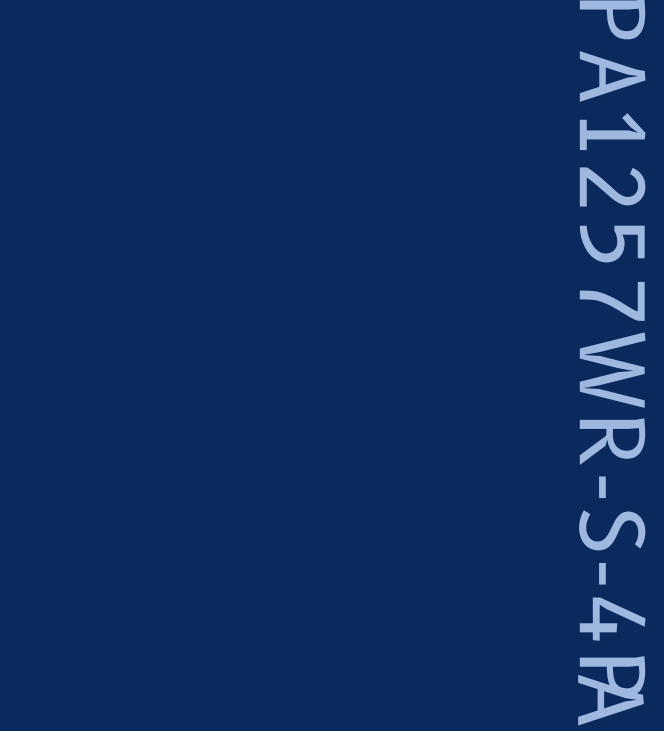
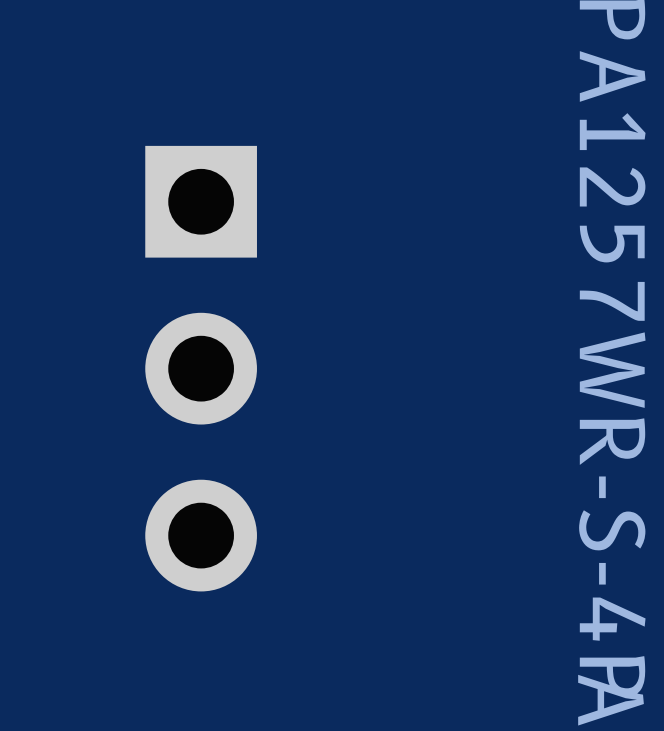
part: none -> (201, 368)

